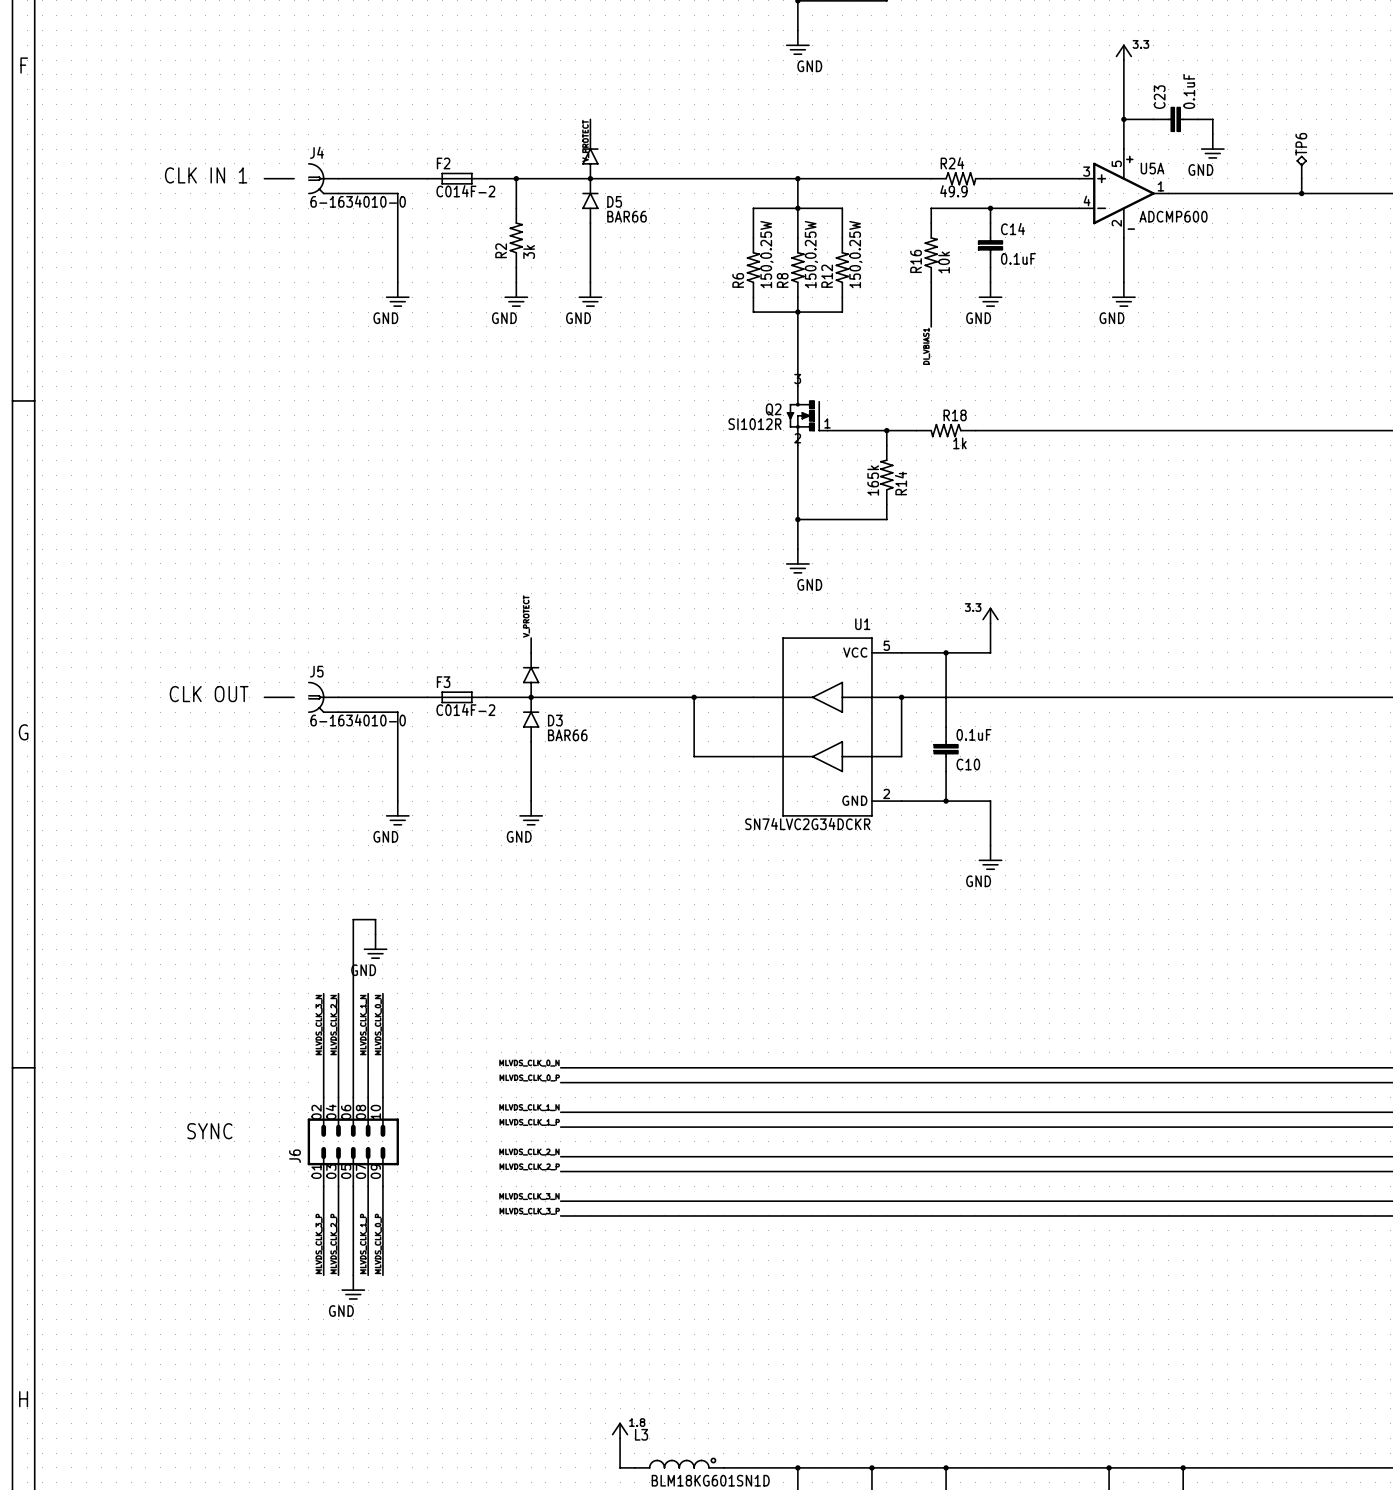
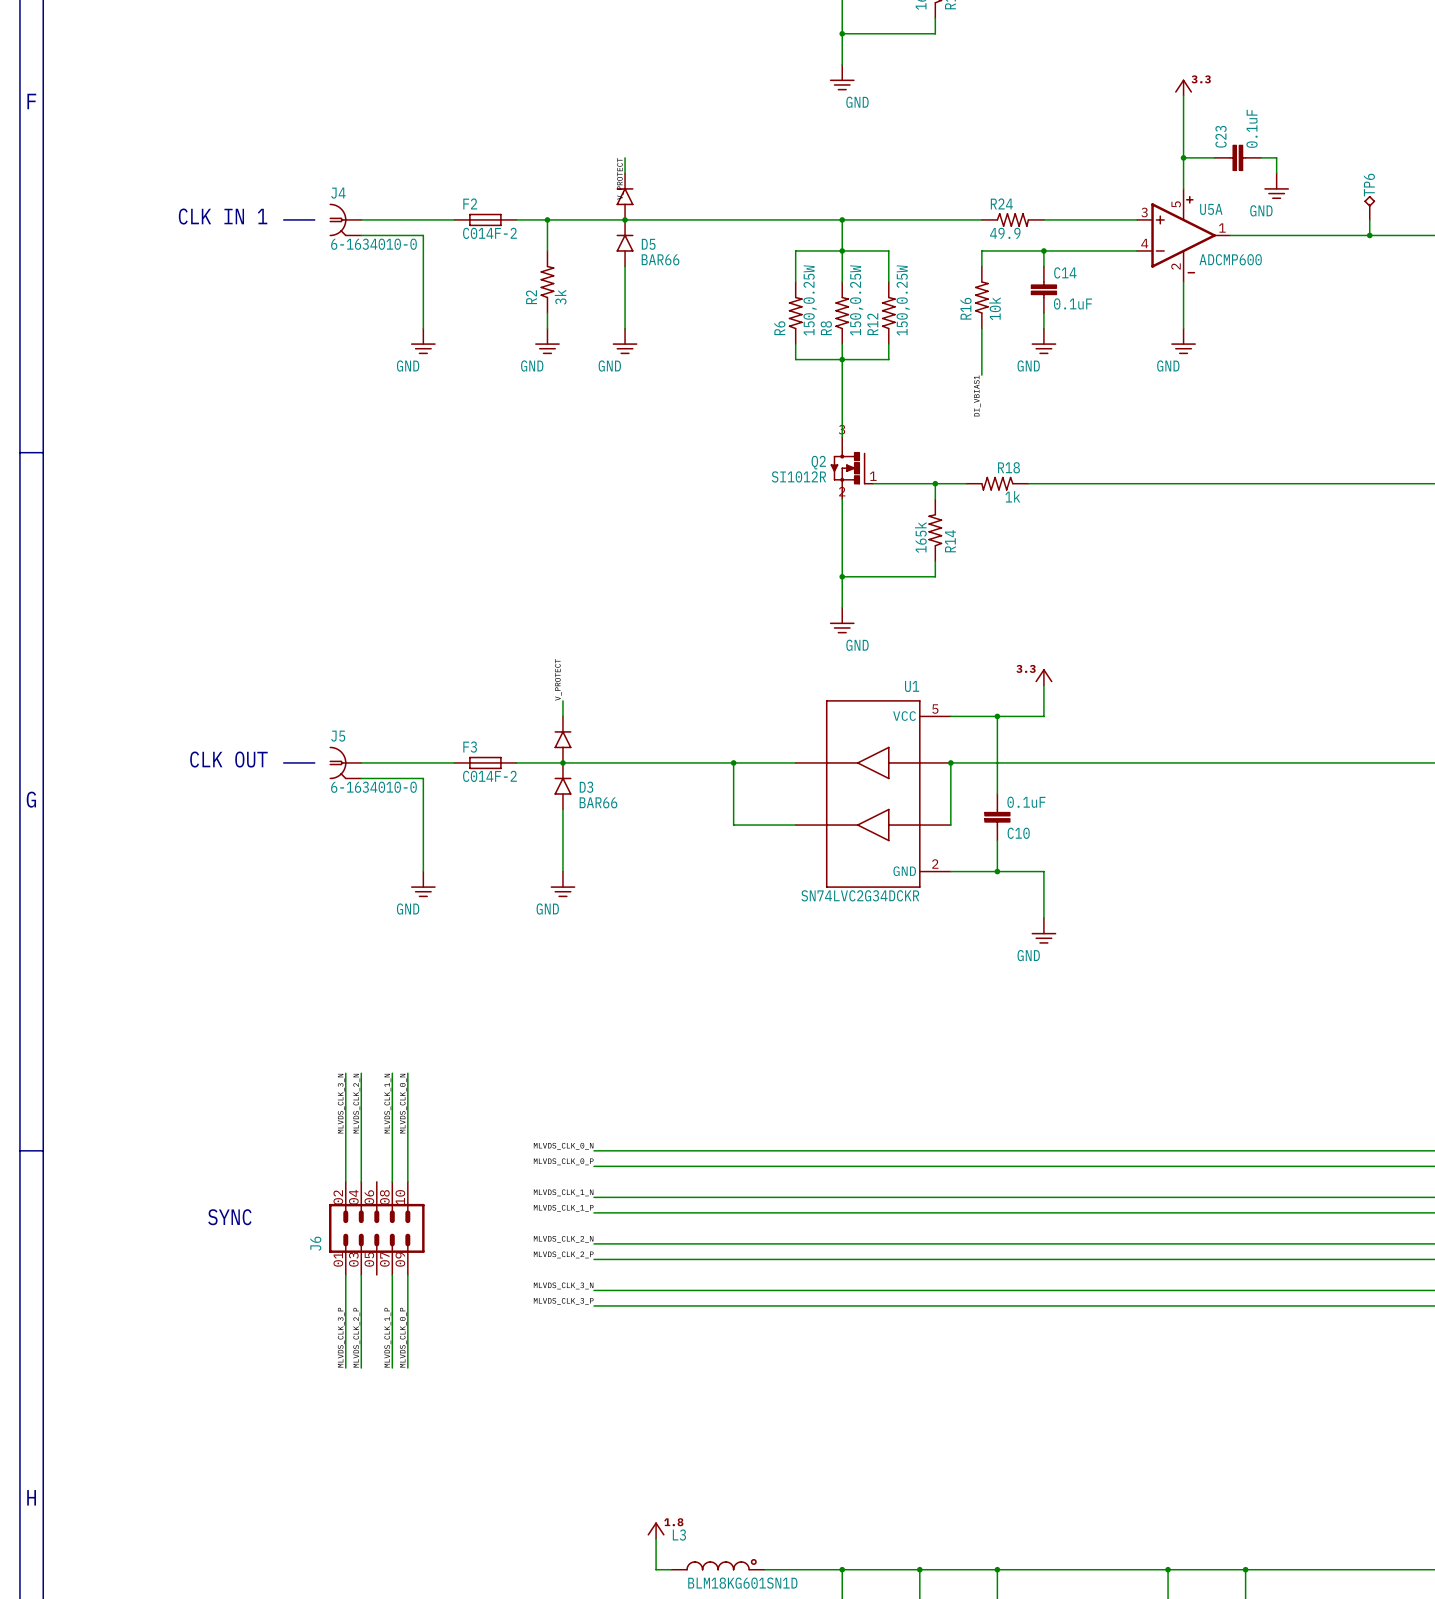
wire: (375, 934) (375, 919) (353, 919) (353, 1097) -> none
power symbol: GND (375, 946) -> none
wire: (353, 1186) (353, 1275) -> none
power symbol: GND (353, 1287) -> none

